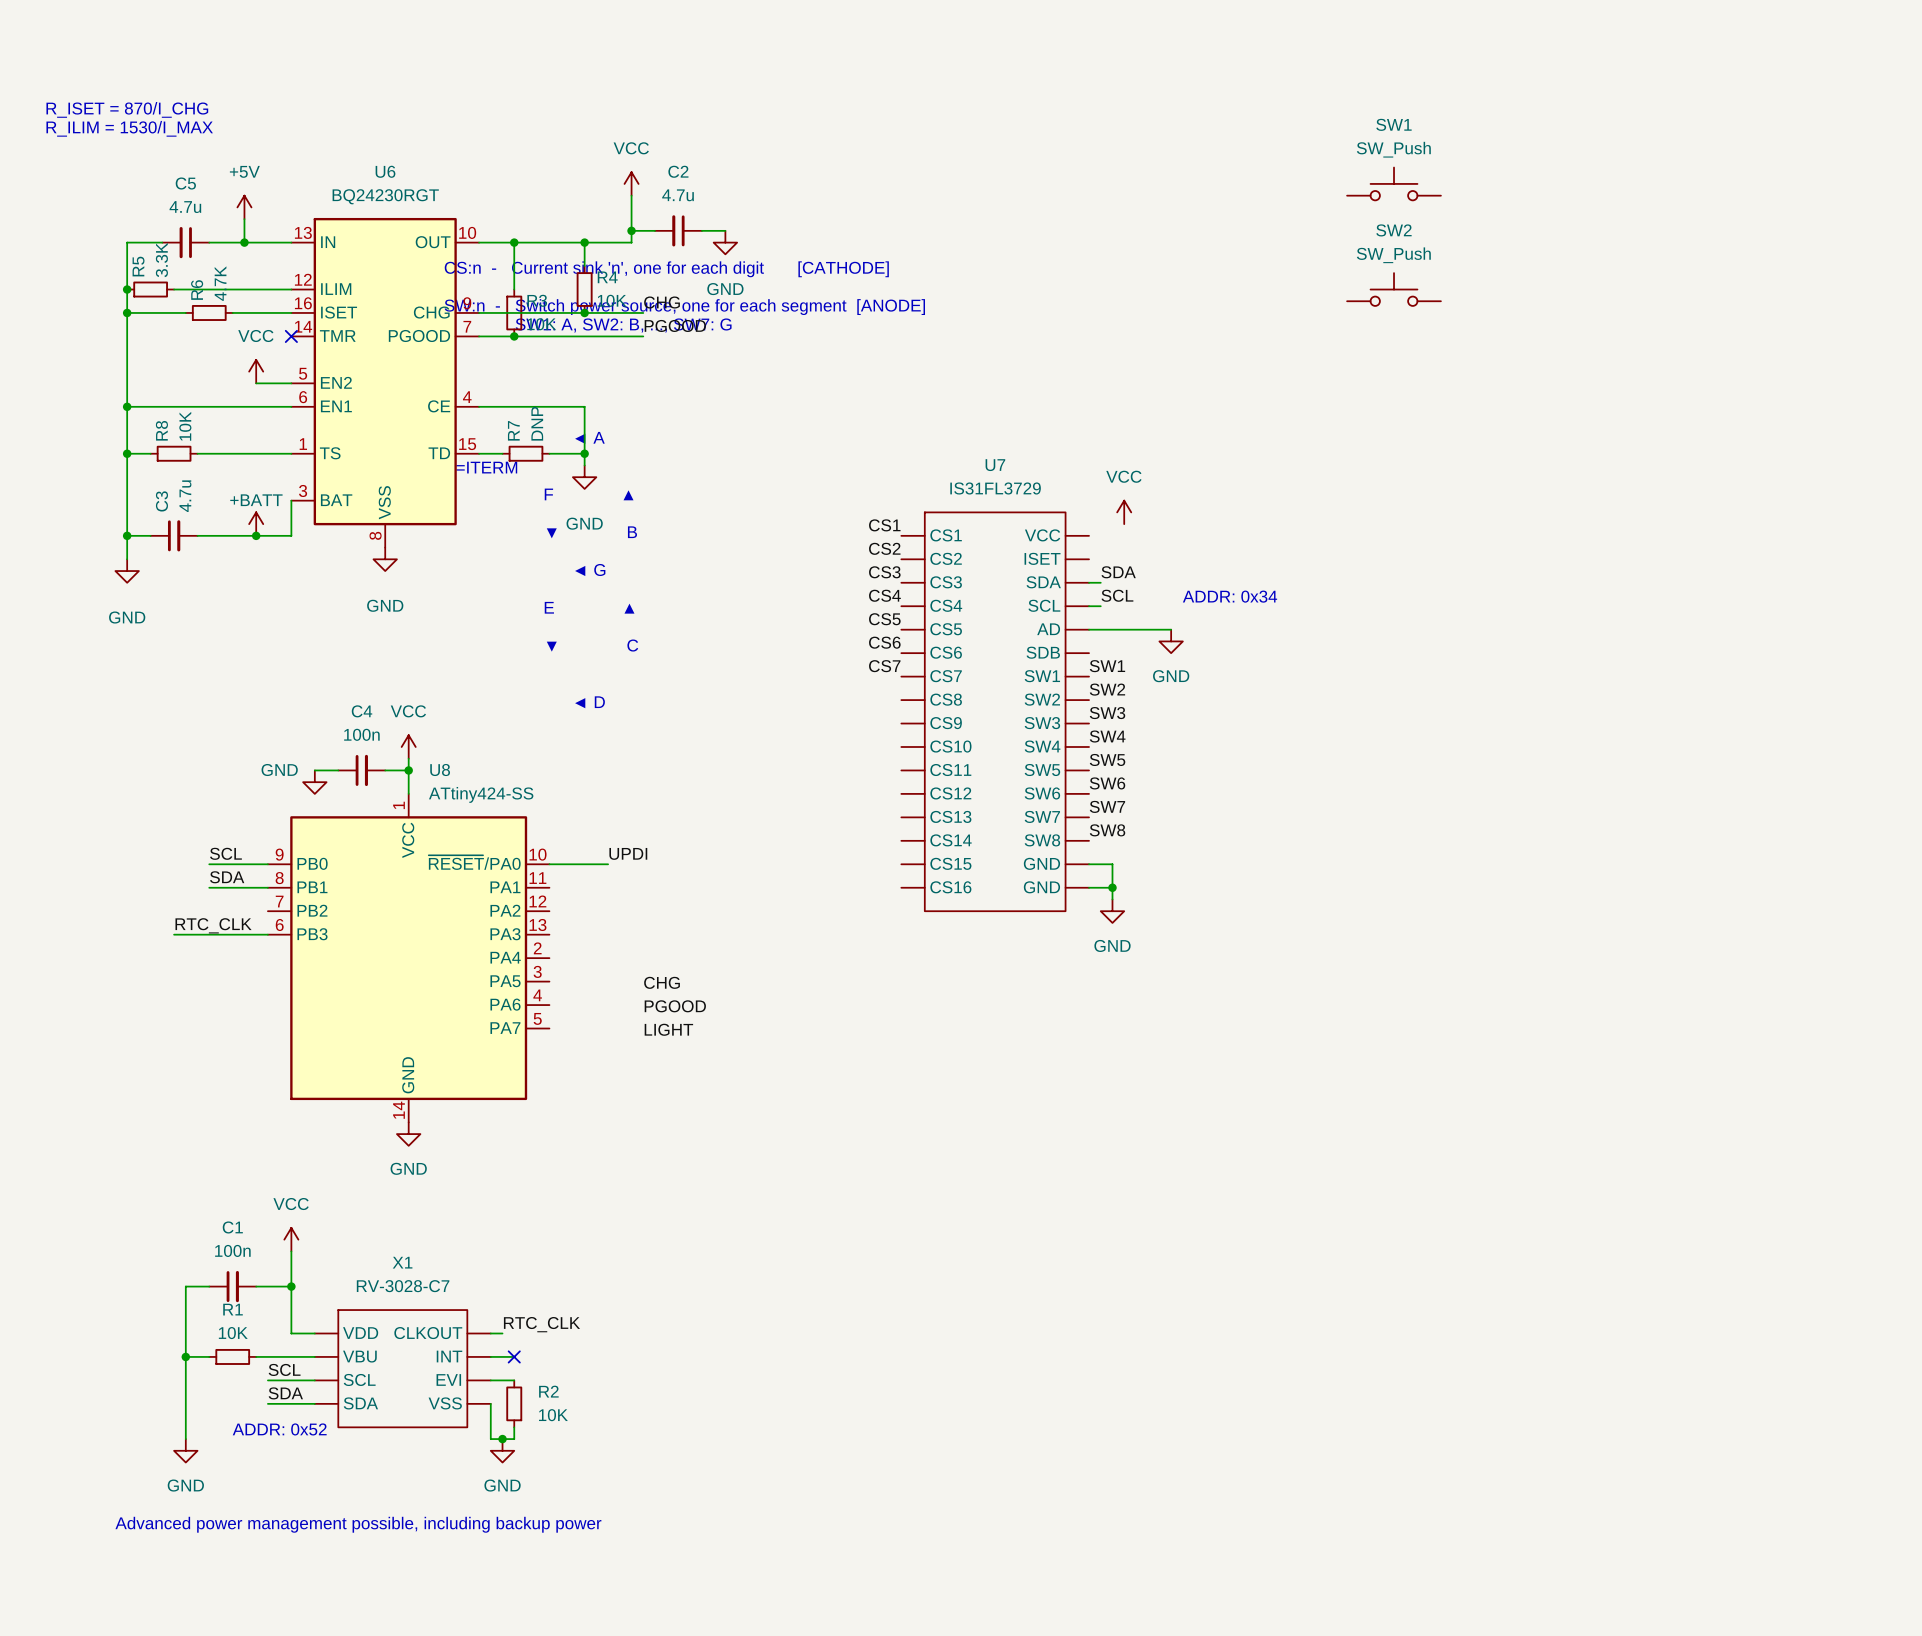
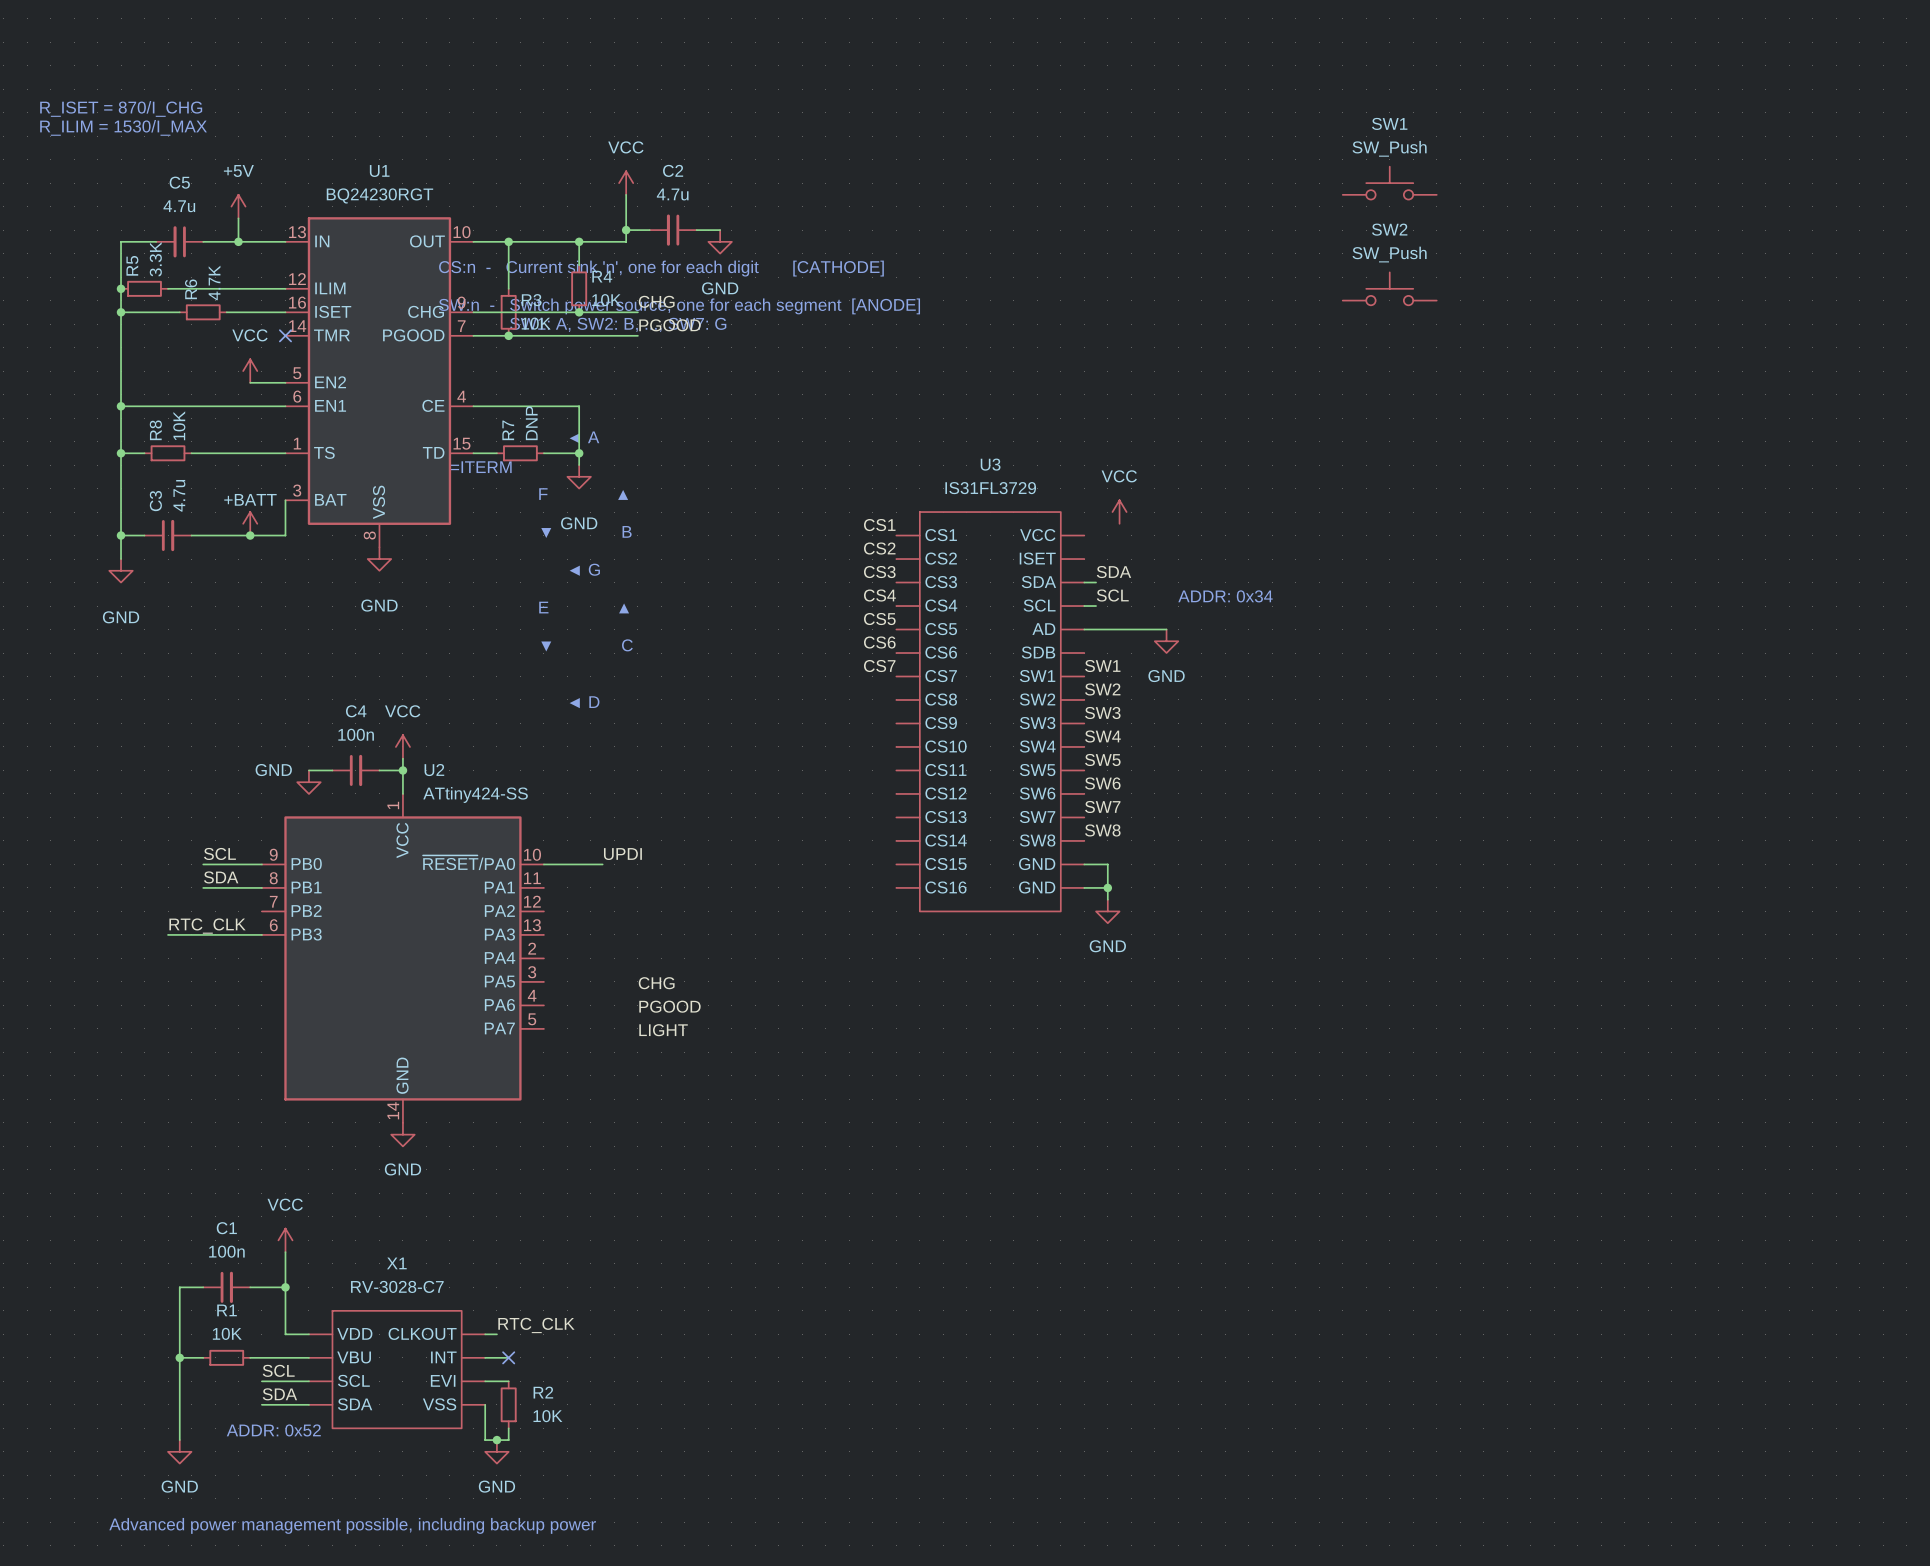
U6 name: U6 (385, 171) -> U1 (379, 171)
U7 name: U7 (995, 465) -> U3 (990, 464)
U8 name: U8 (440, 770) -> U2 (434, 770)

